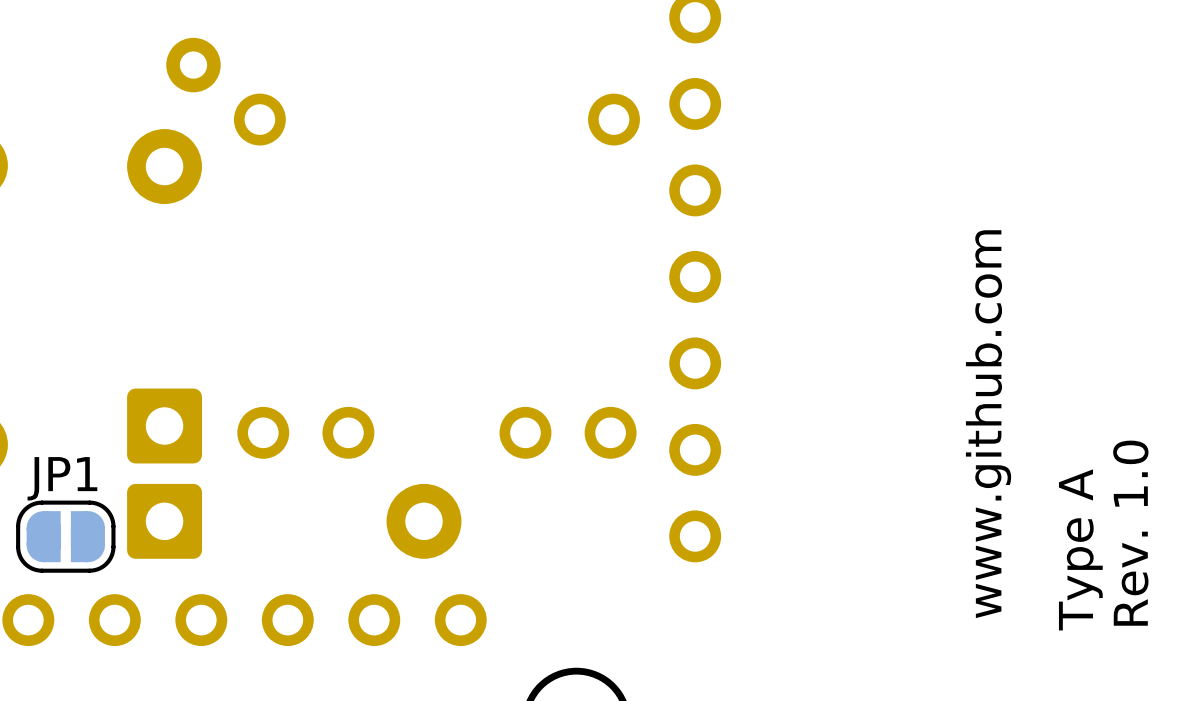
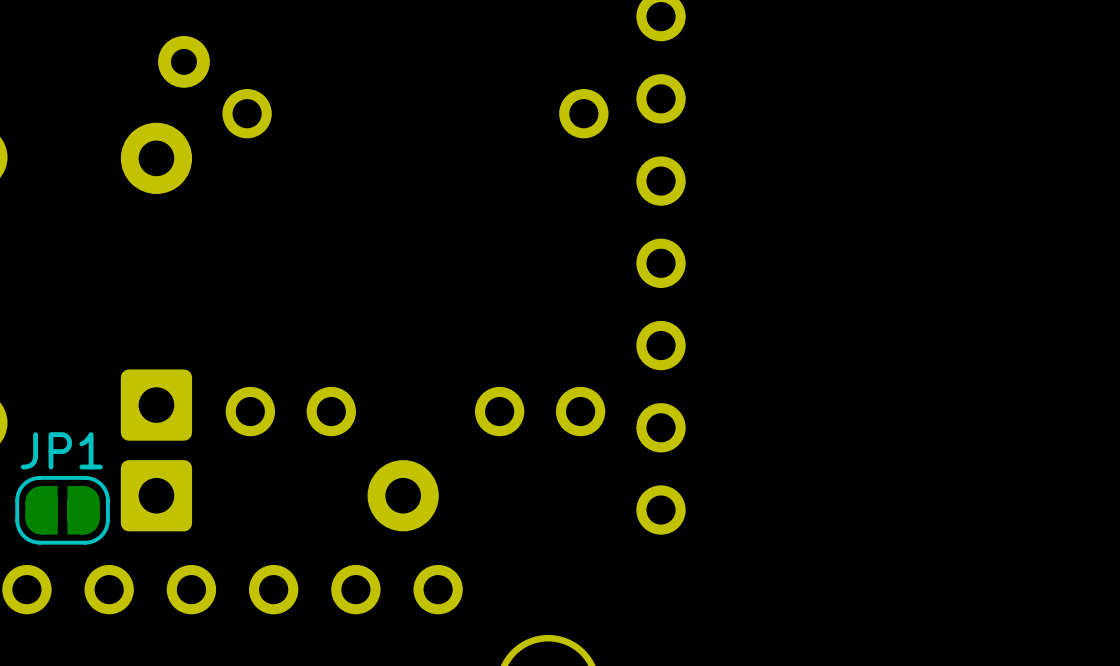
text: www.github.com (988, 424) -> none
text: Rev. 1.0 (1130, 533) -> none
text: Type A (1080, 549) -> none

